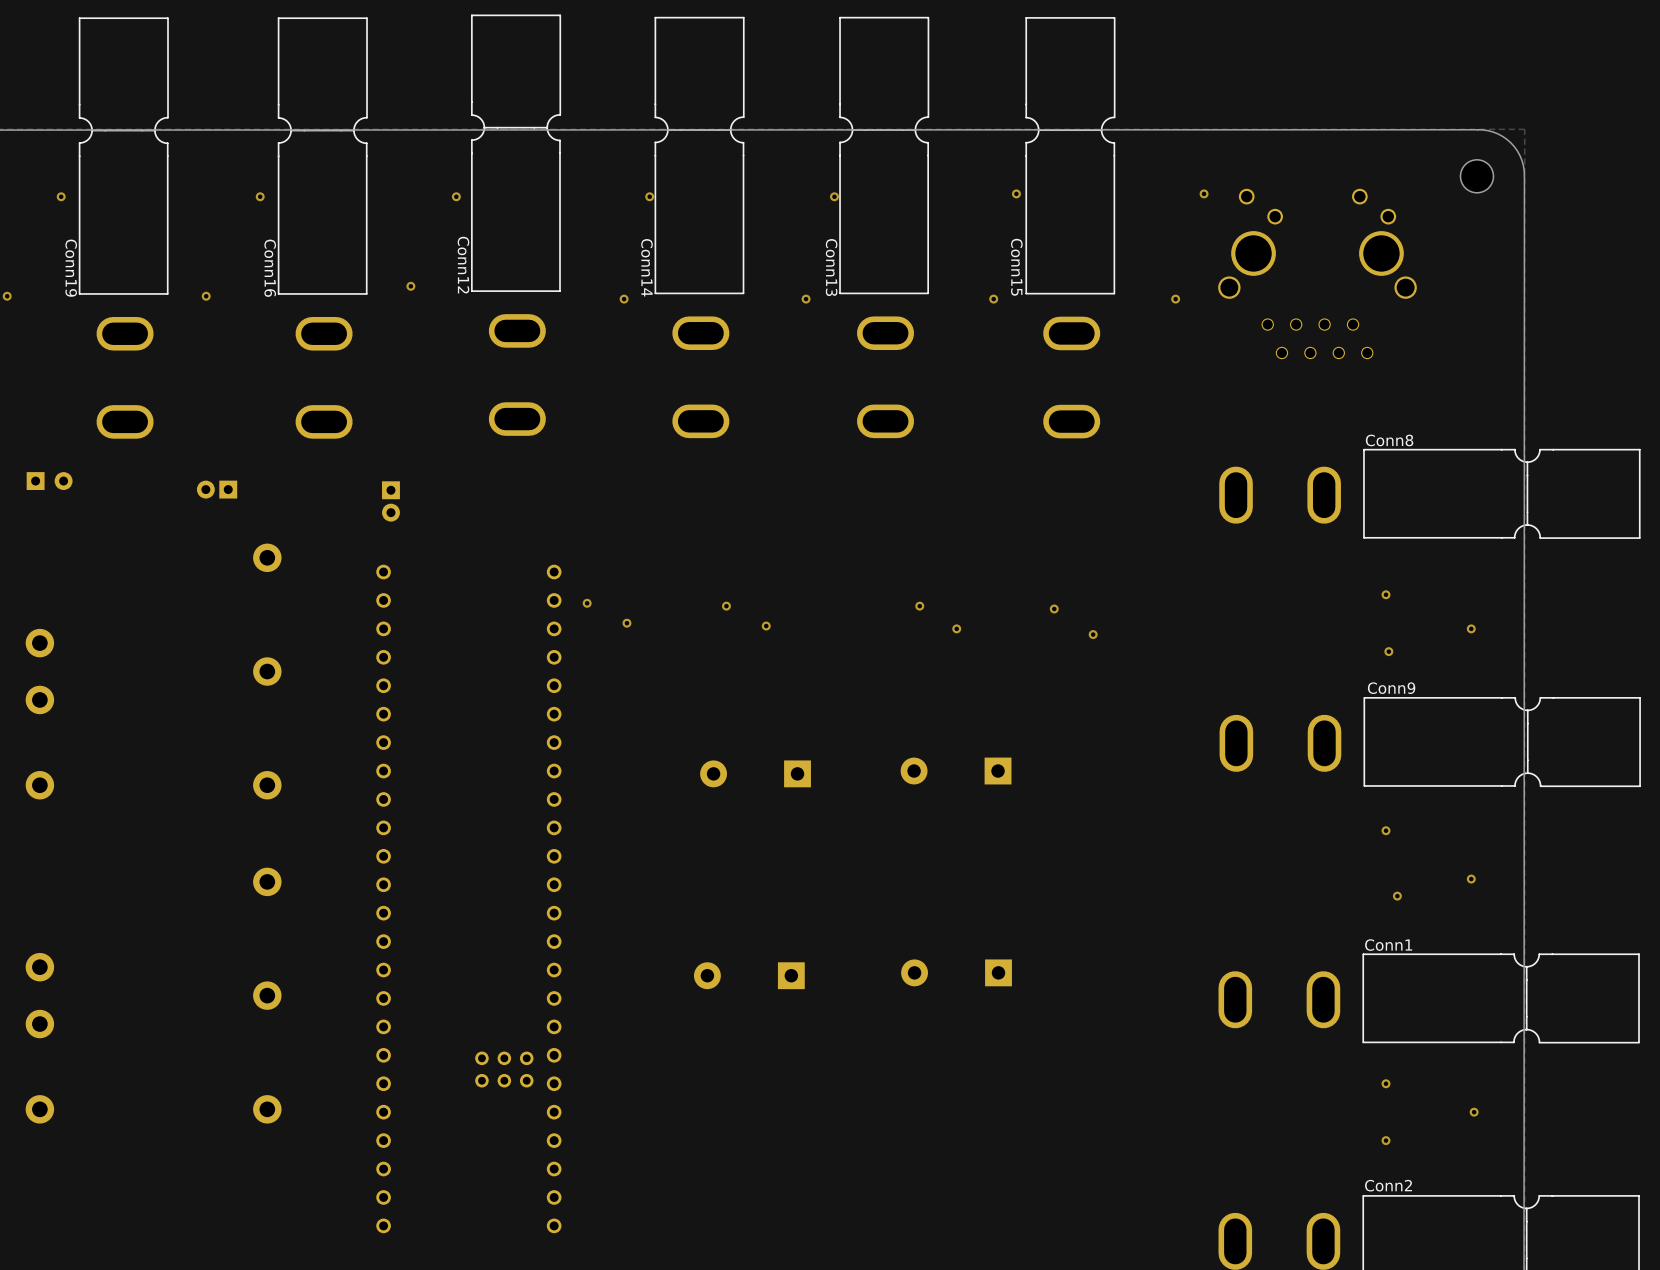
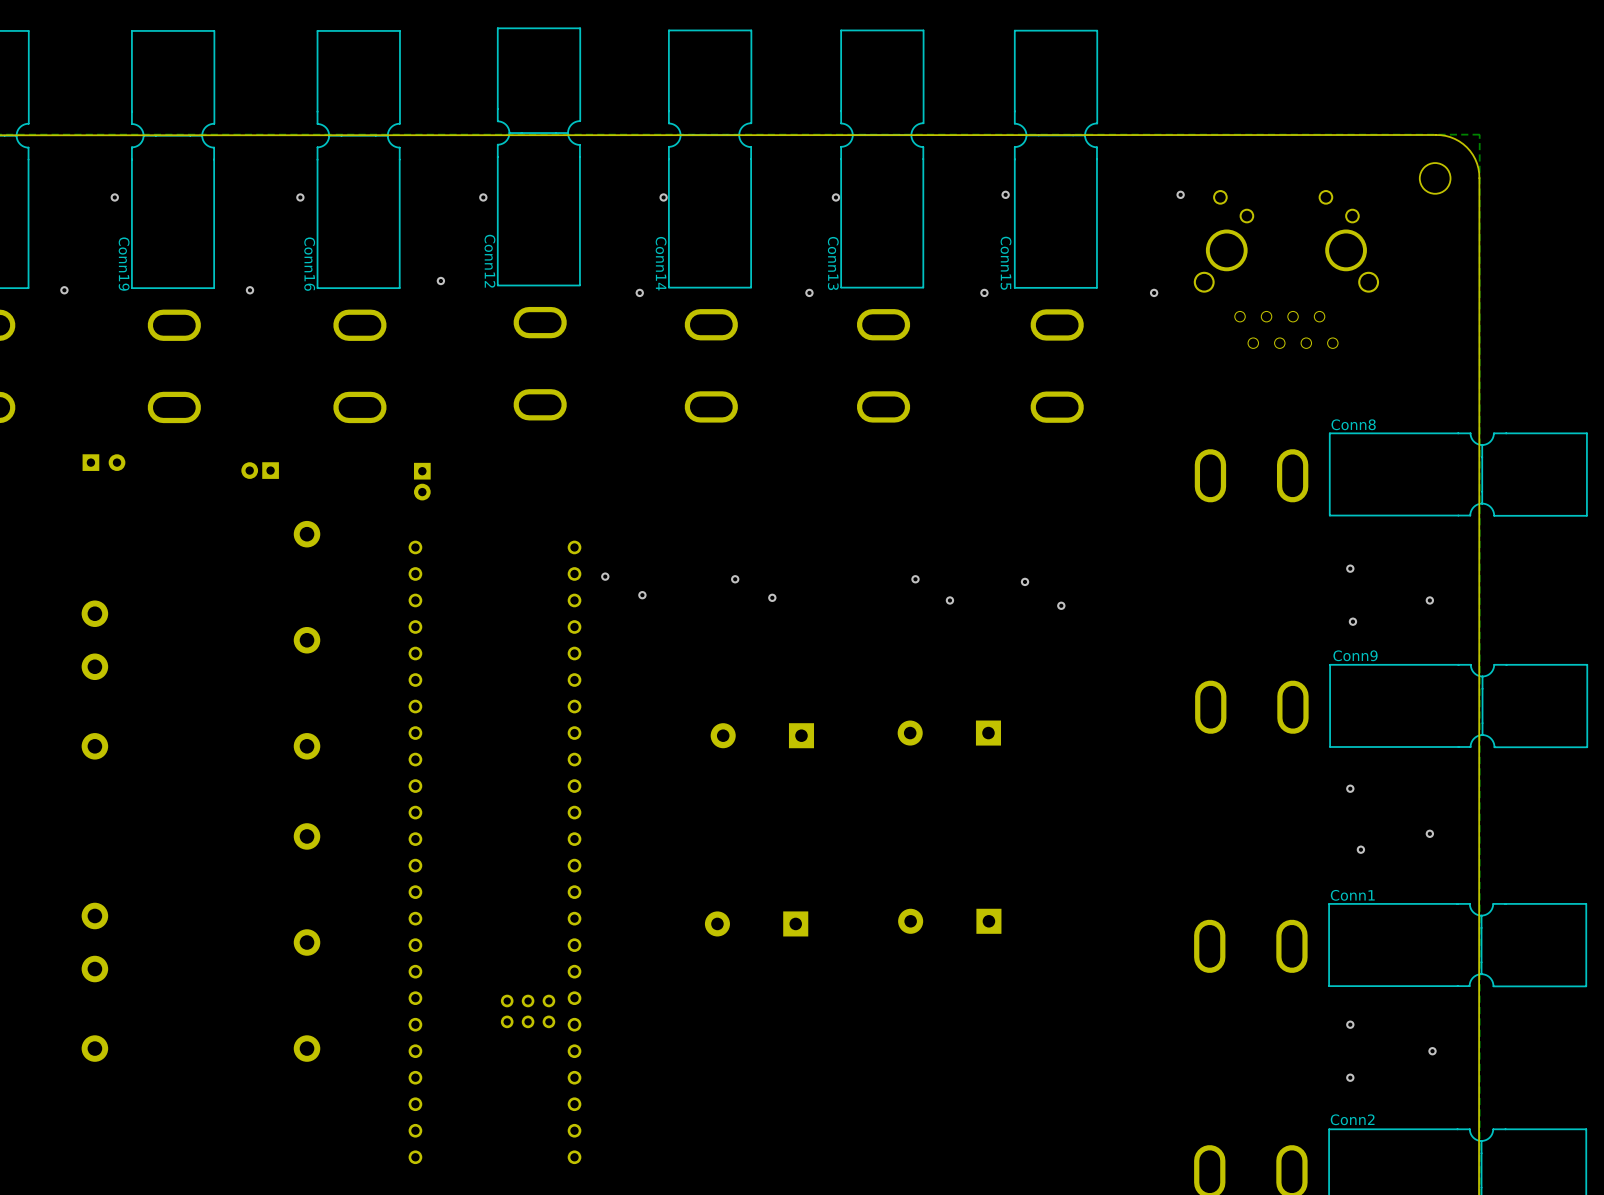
via: none -> (1025, 581)
via: (1054, 608) -> none
via: none -> (1061, 605)
via: (1093, 634) -> none

